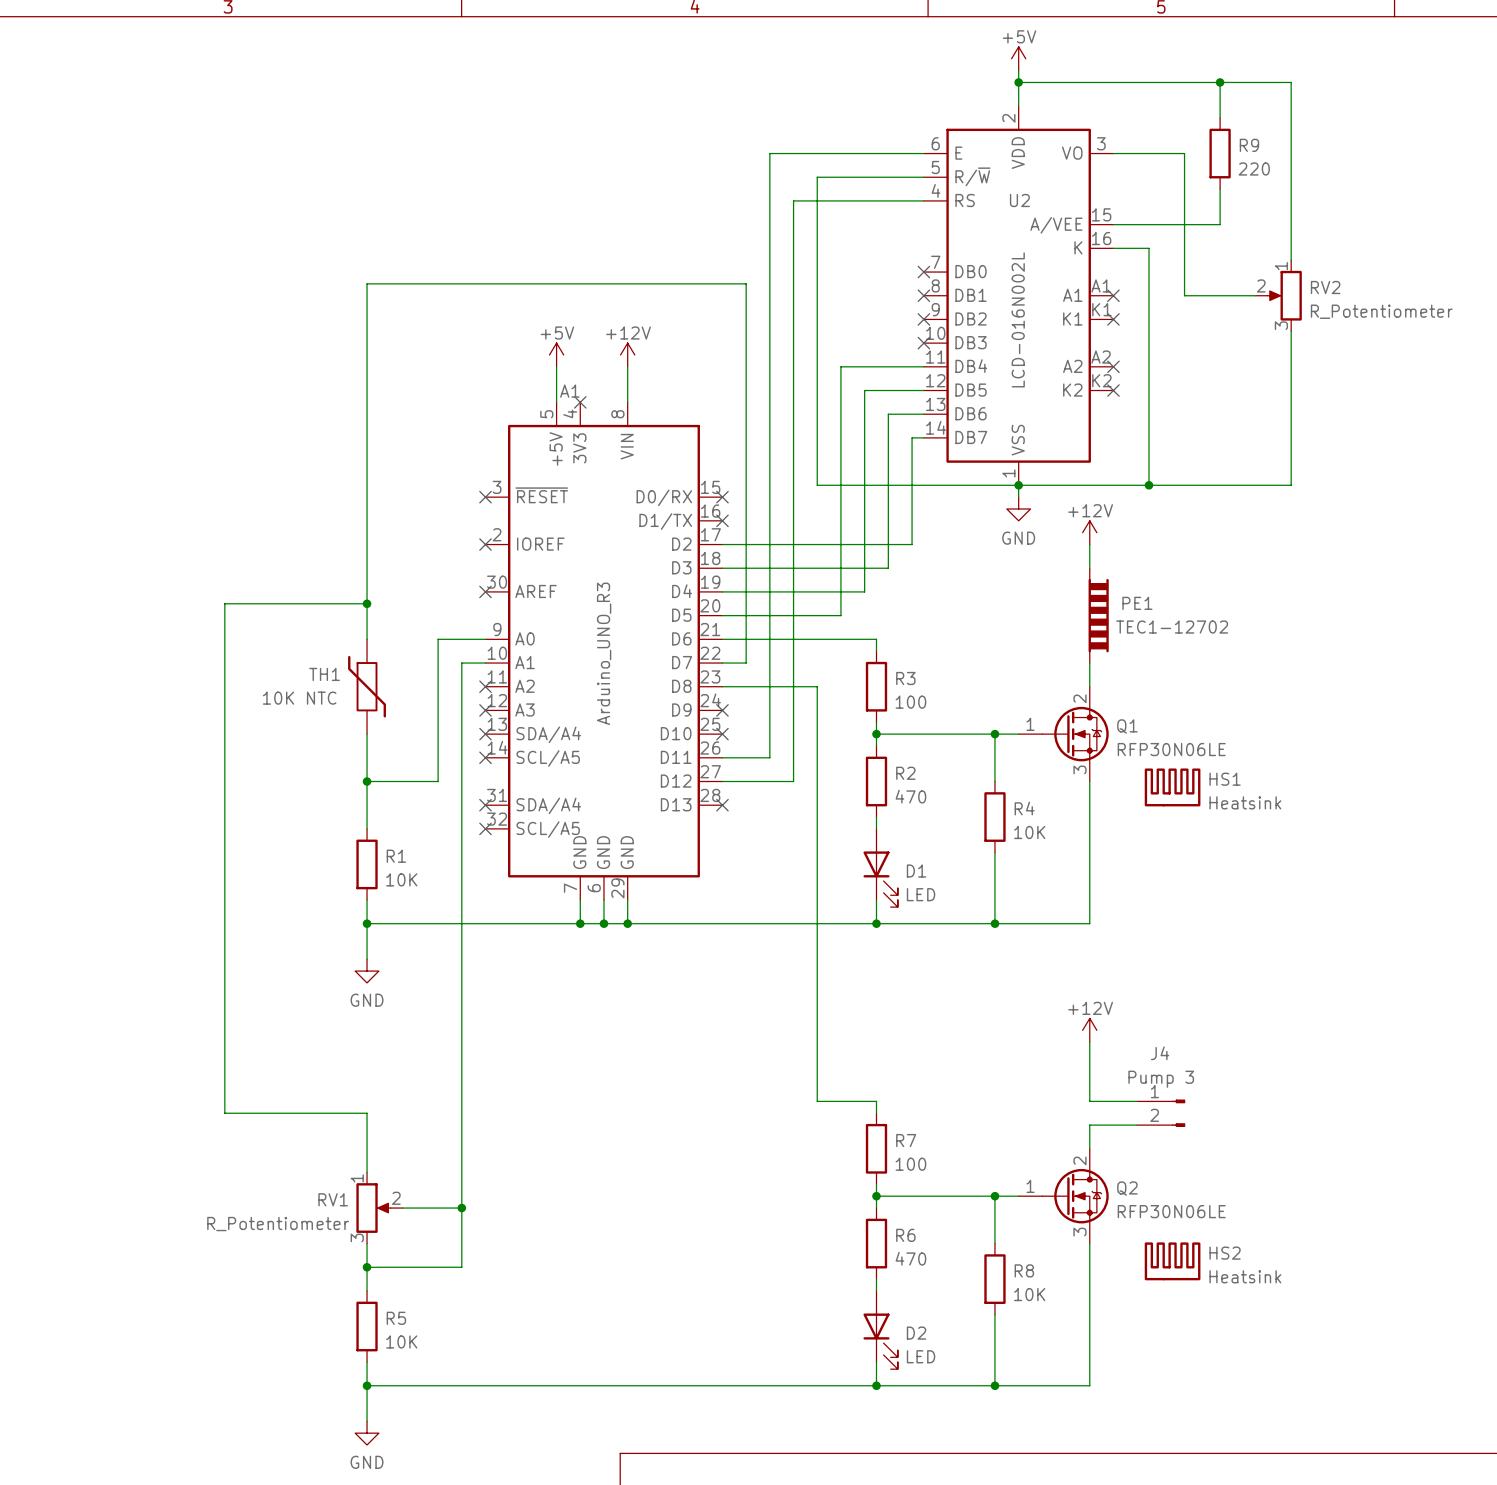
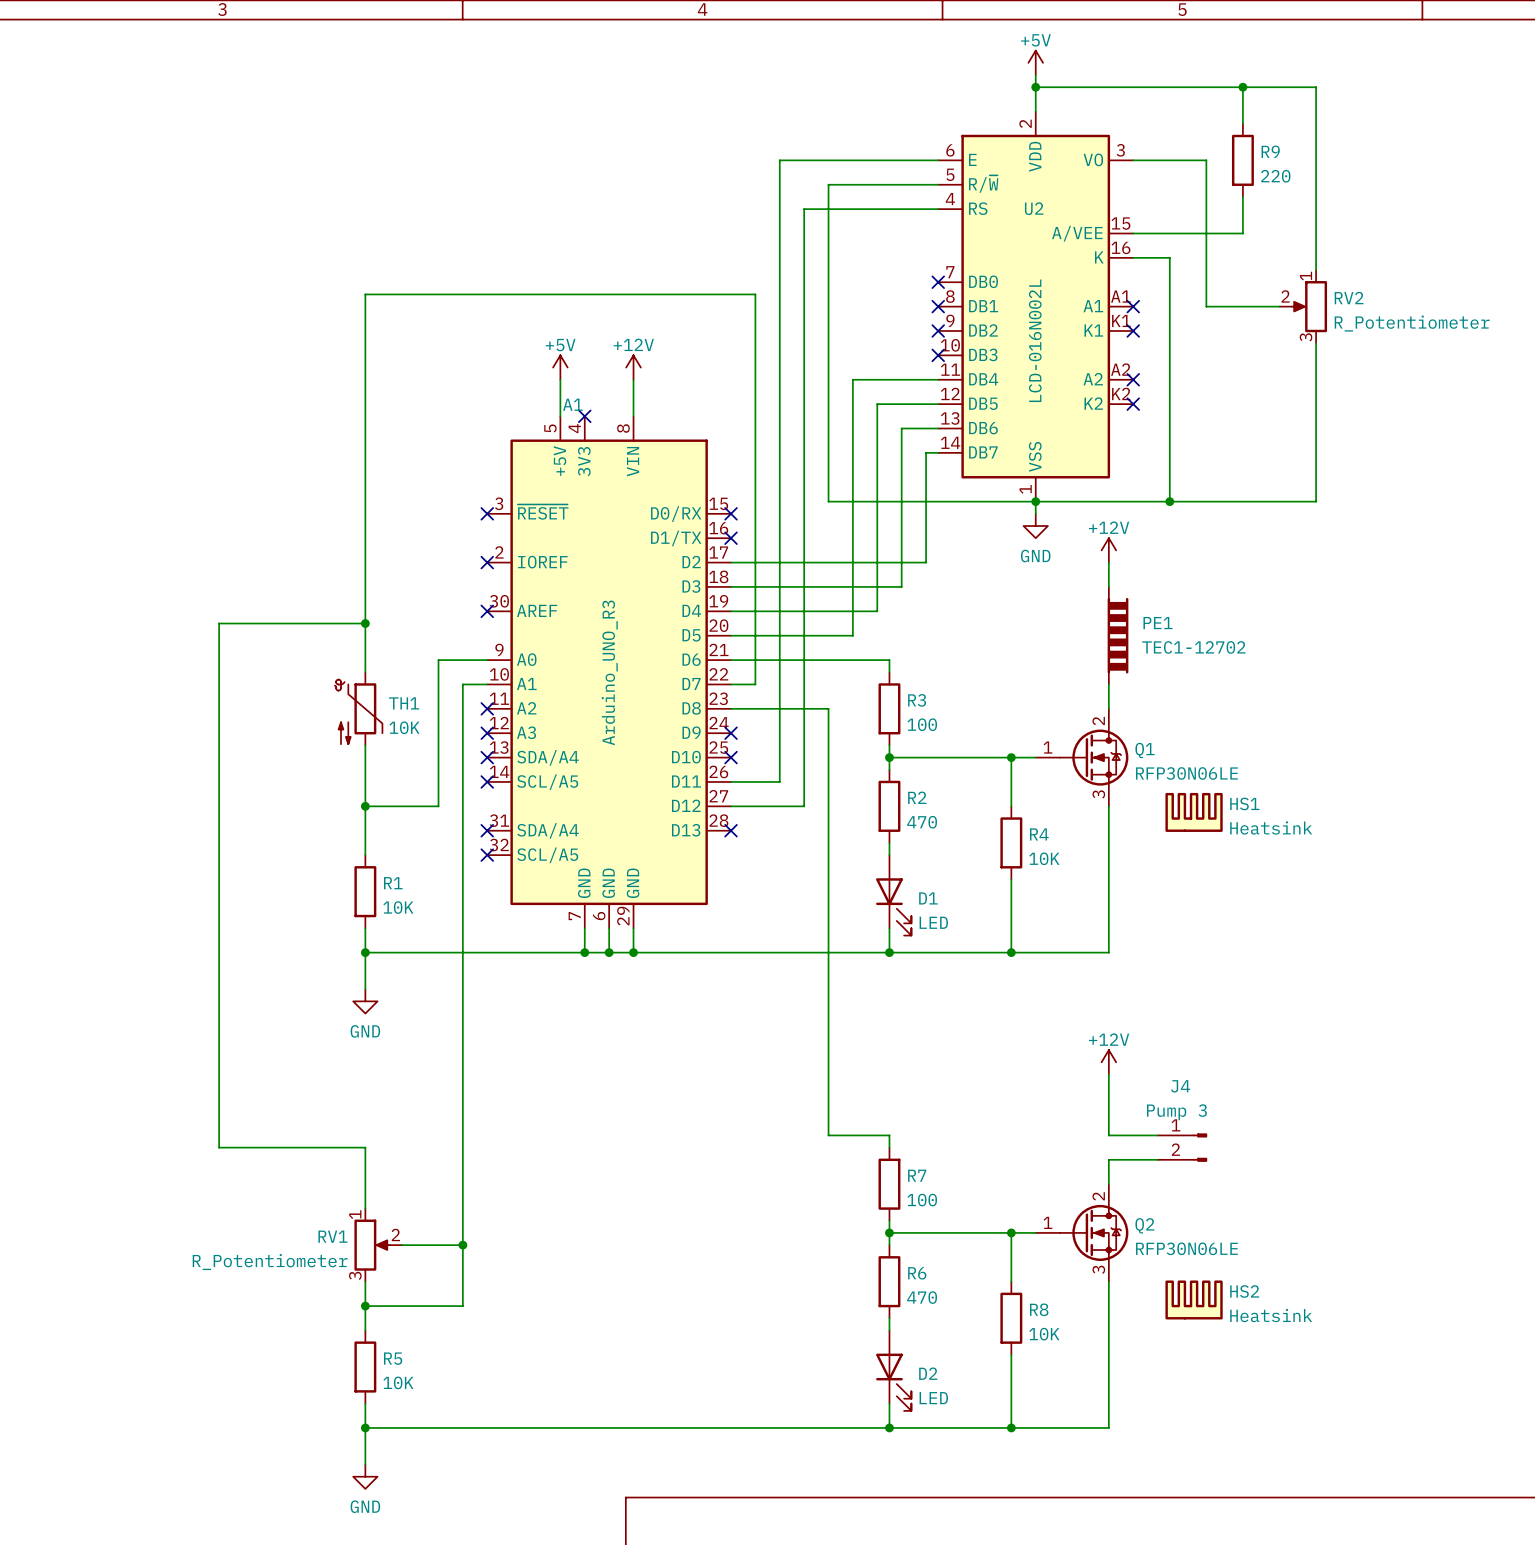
TH1 symbol: [348, 639, 386, 735] -> [334, 672, 383, 746]
TH1 name position: TH1 (324, 674) -> TH1 (404, 703)
TH1 value: 10K NTC (299, 698) -> 10K (404, 727)

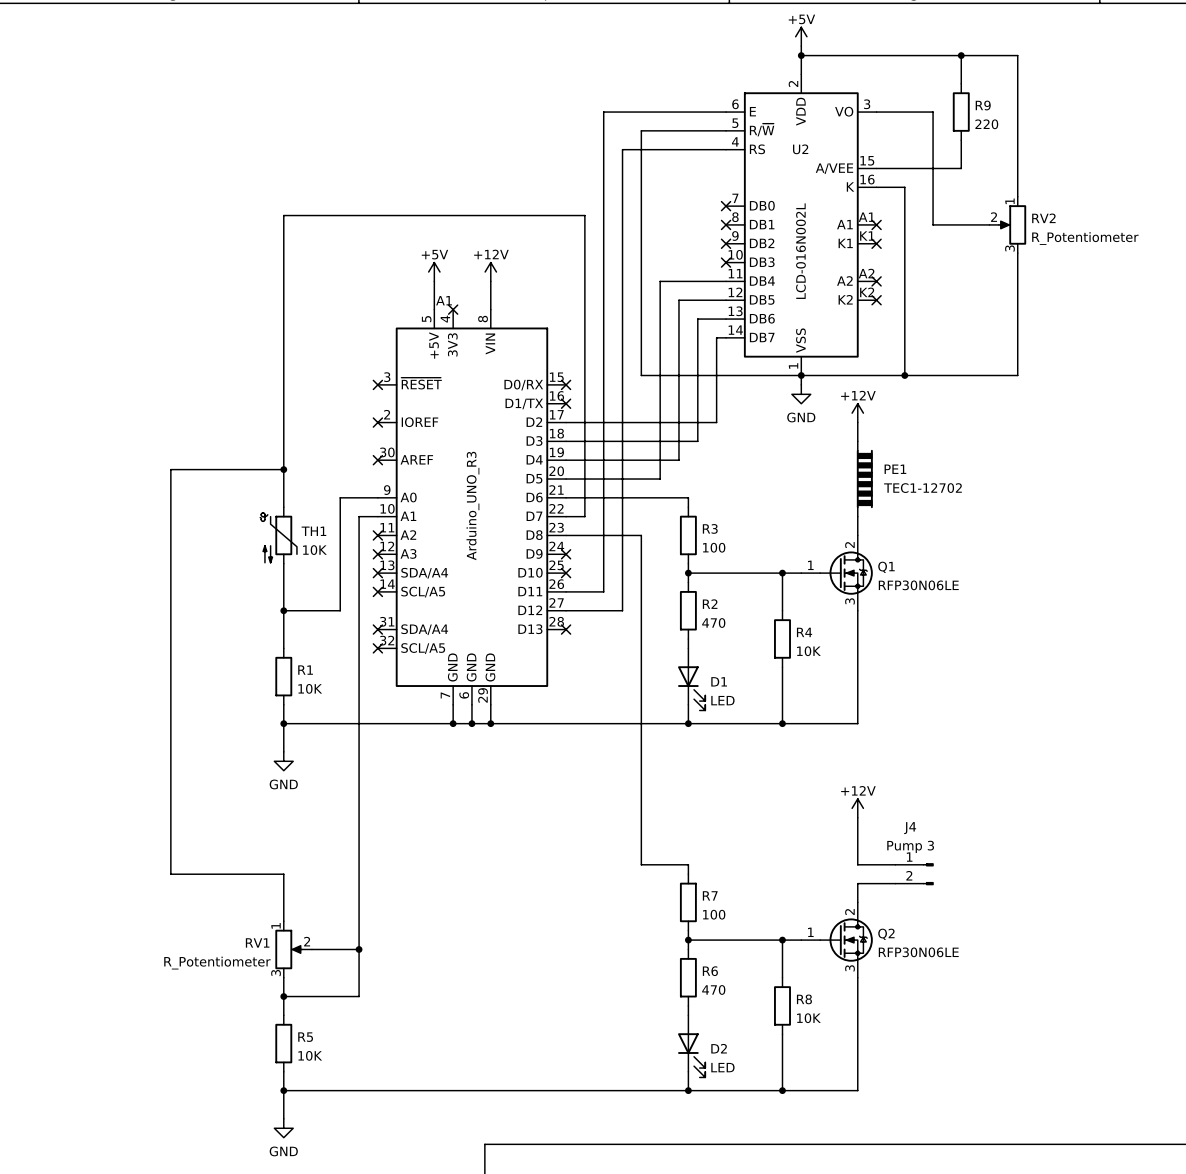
HS1: Heatsink (1194, 812) -> none
HS2: Heatsink (1194, 1299) -> none

